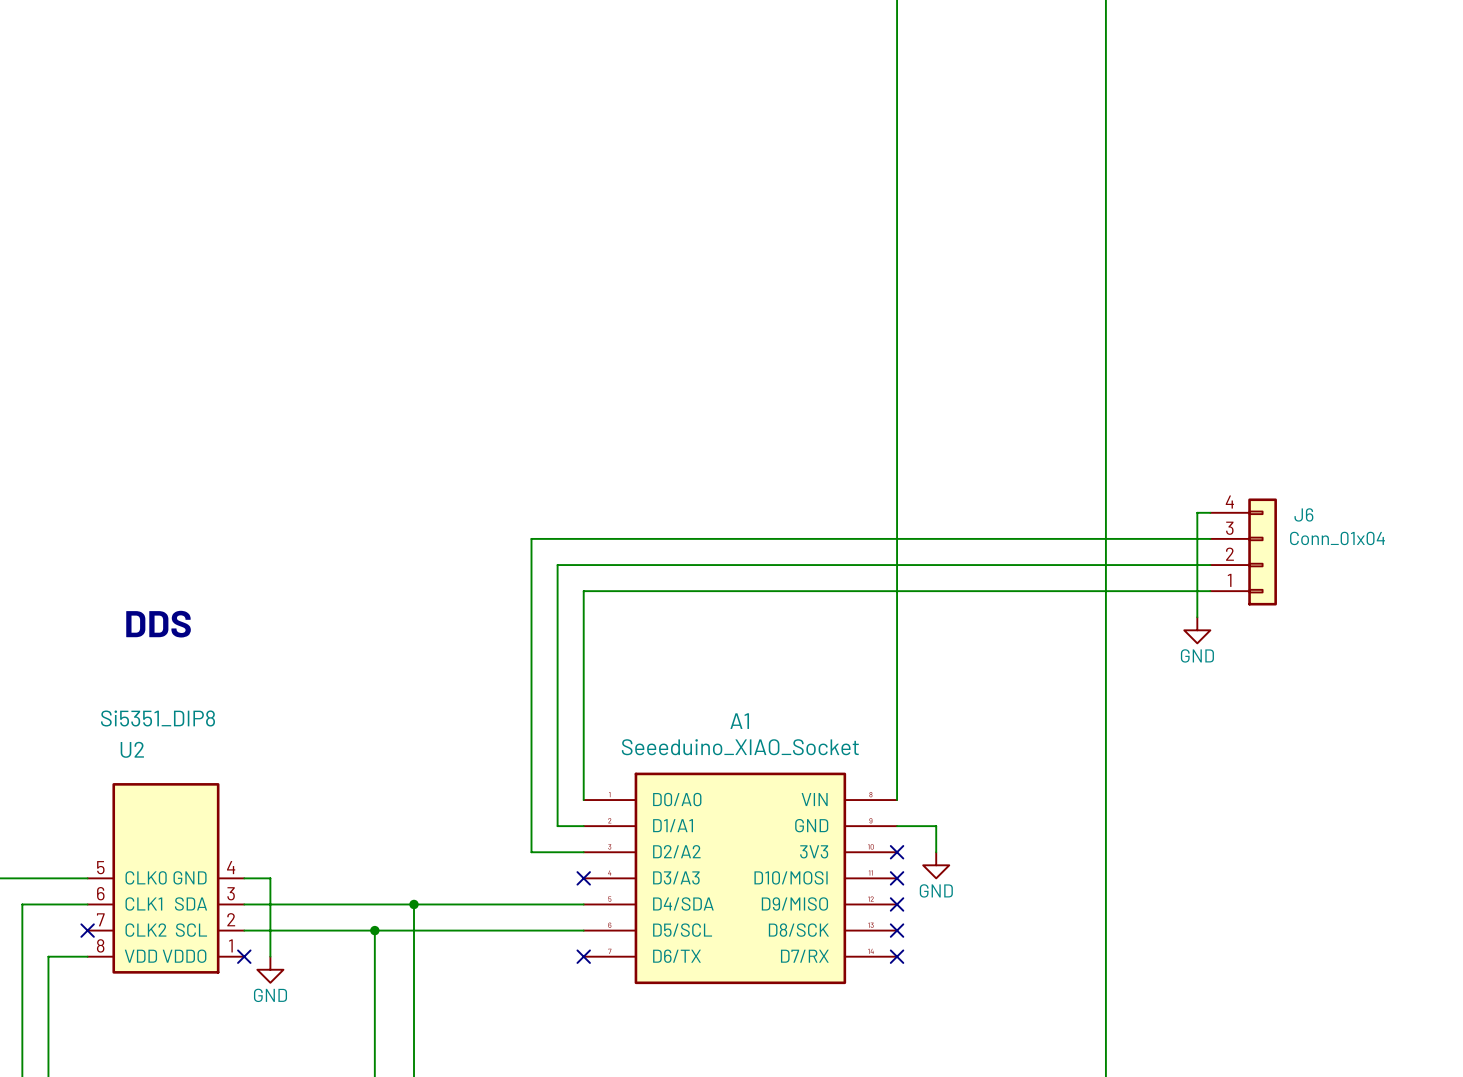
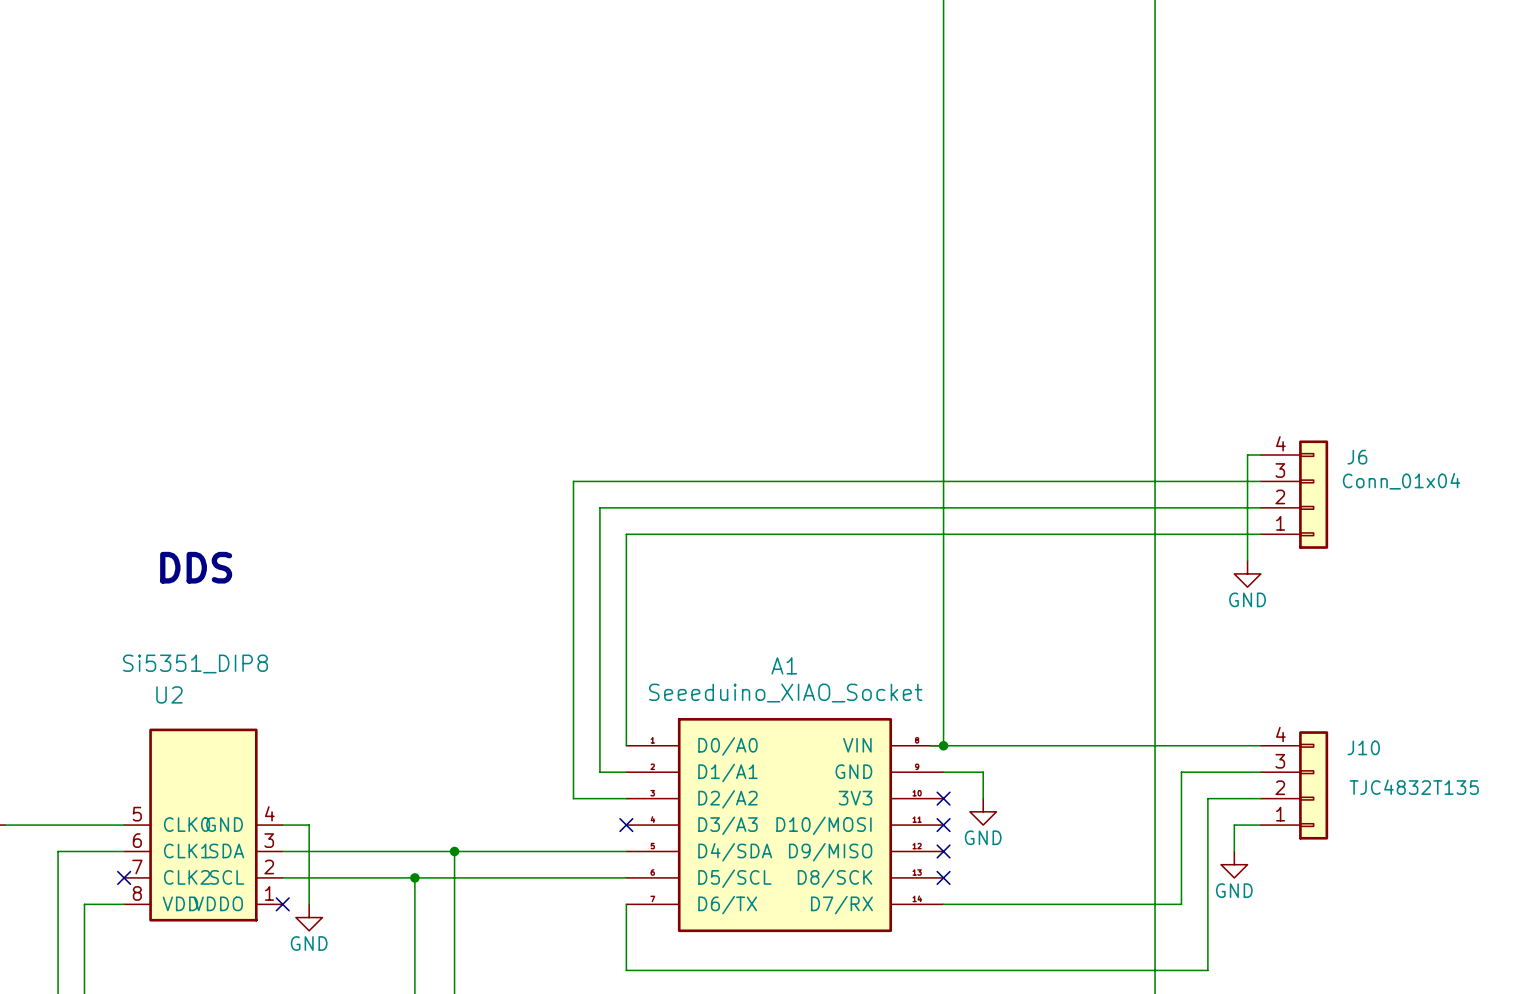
wire: none -> (930, 745) (1260, 745)
junction: none -> (943, 745)
wire: none -> (1260, 772) (1181, 772) (1181, 904) (943, 904)
J10: none -> TJC4832T135 (1294, 785)
wire: none -> (1260, 798) (1207, 798) (1207, 970) (626, 970) (626, 904)
wire: none -> (1260, 825) (1234, 825) (1234, 851)
power symbol: none -> GND (1234, 864)
no-connect mark: (583, 956) -> none
no-connect mark: (897, 956) -> none

